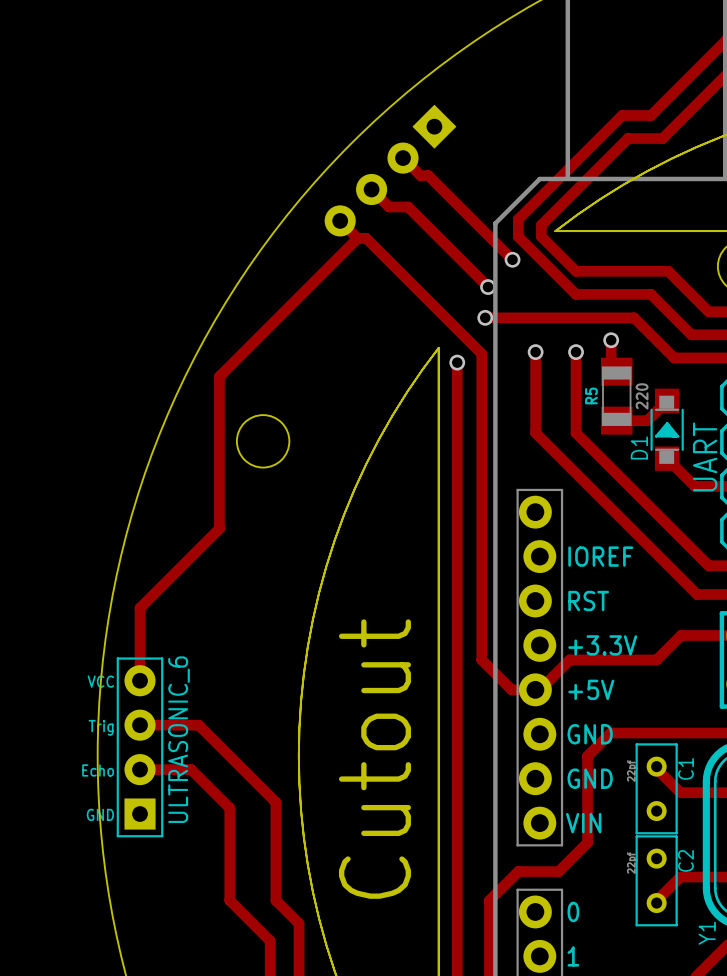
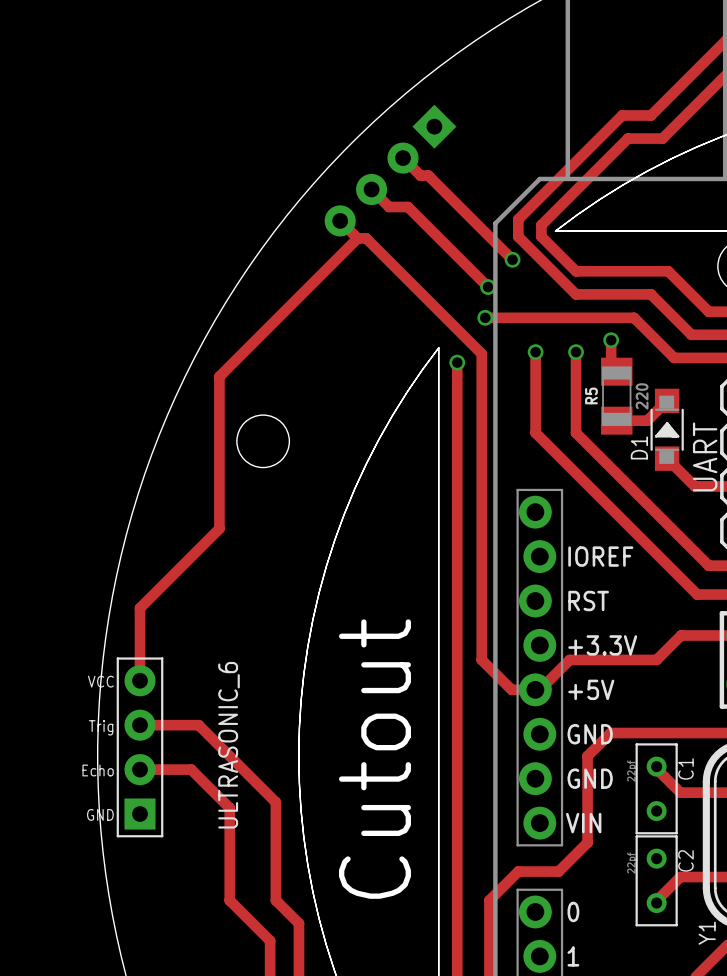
ULTRASONIC_6 name position: ULTRASONIC_6 (179, 739) -> ULTRASONIC_6 (229, 745)

